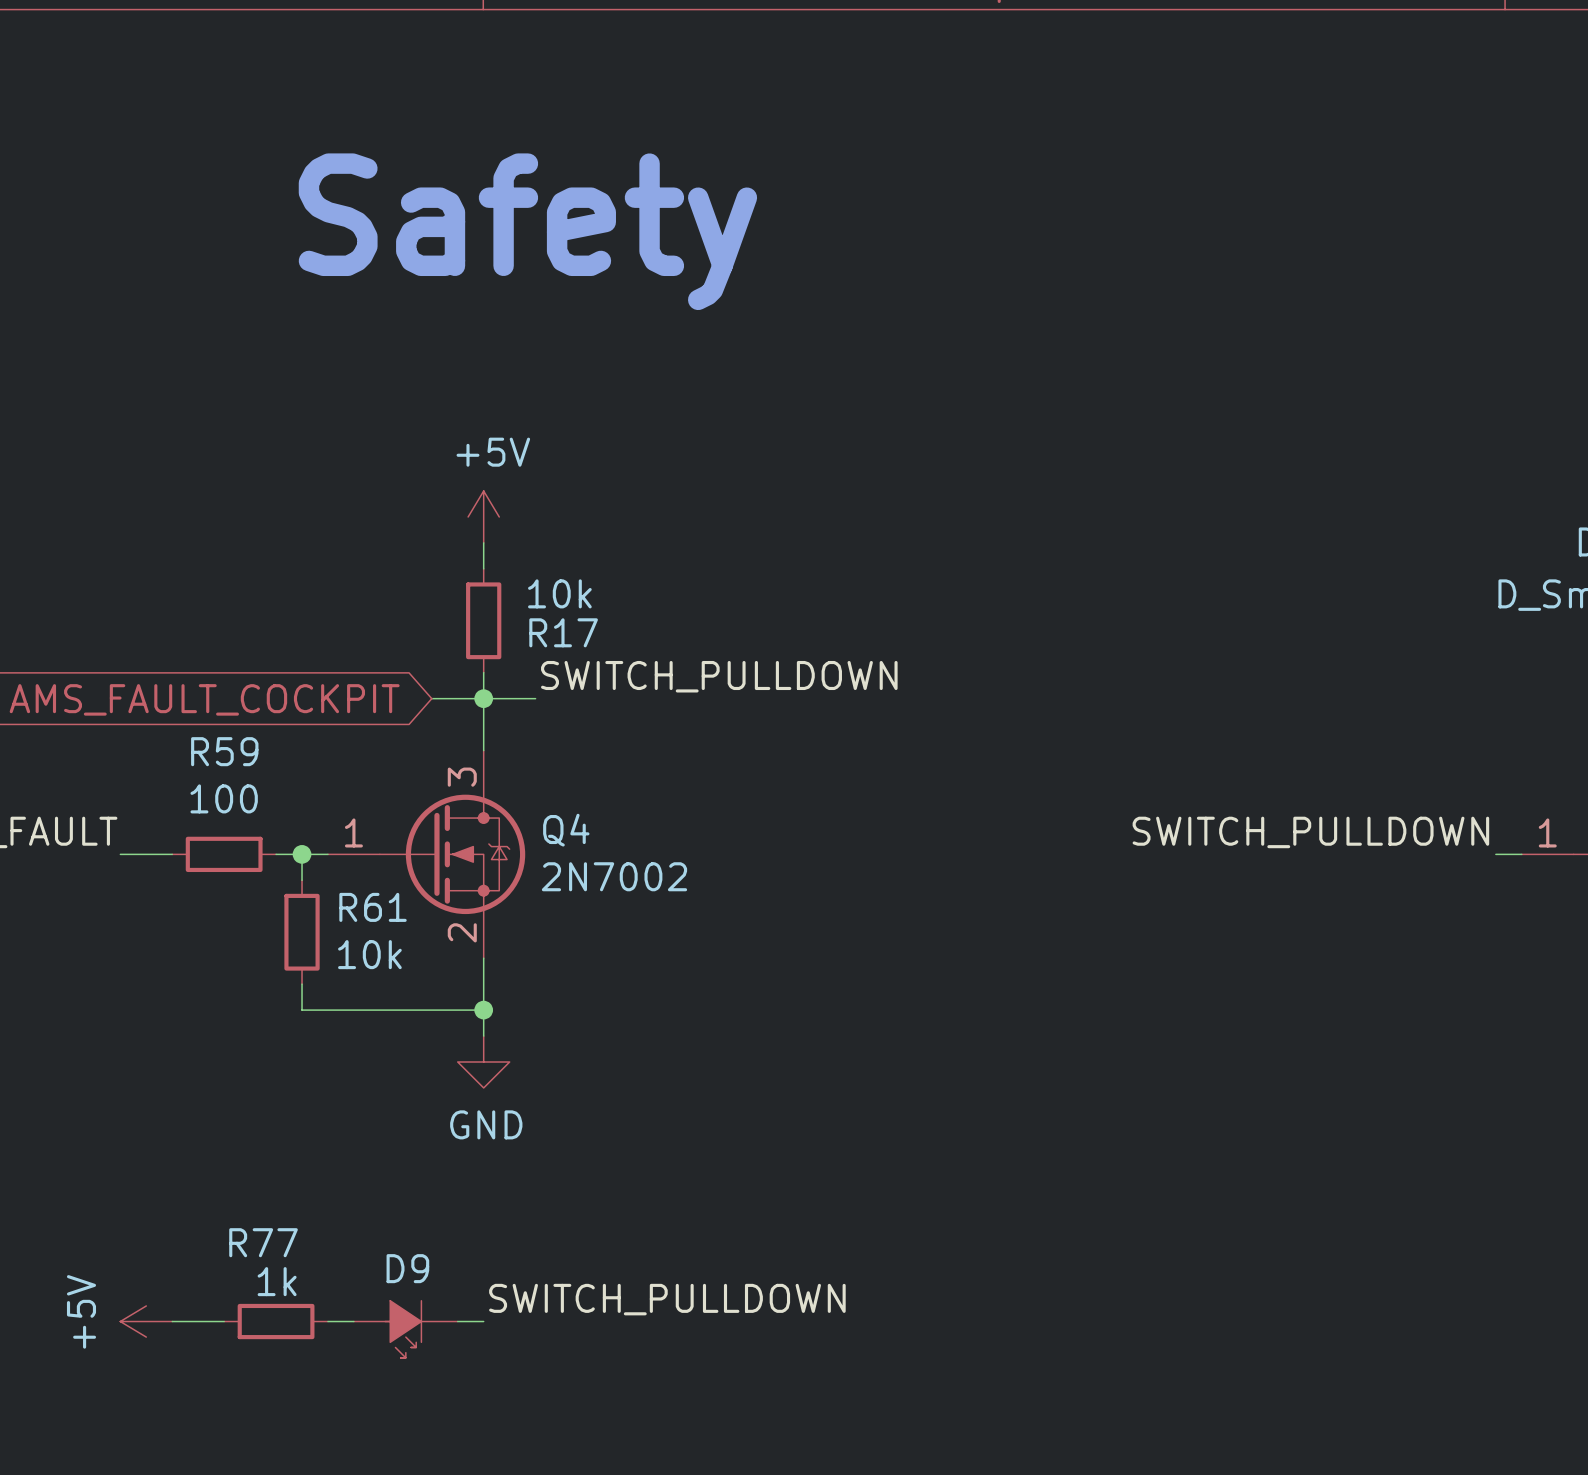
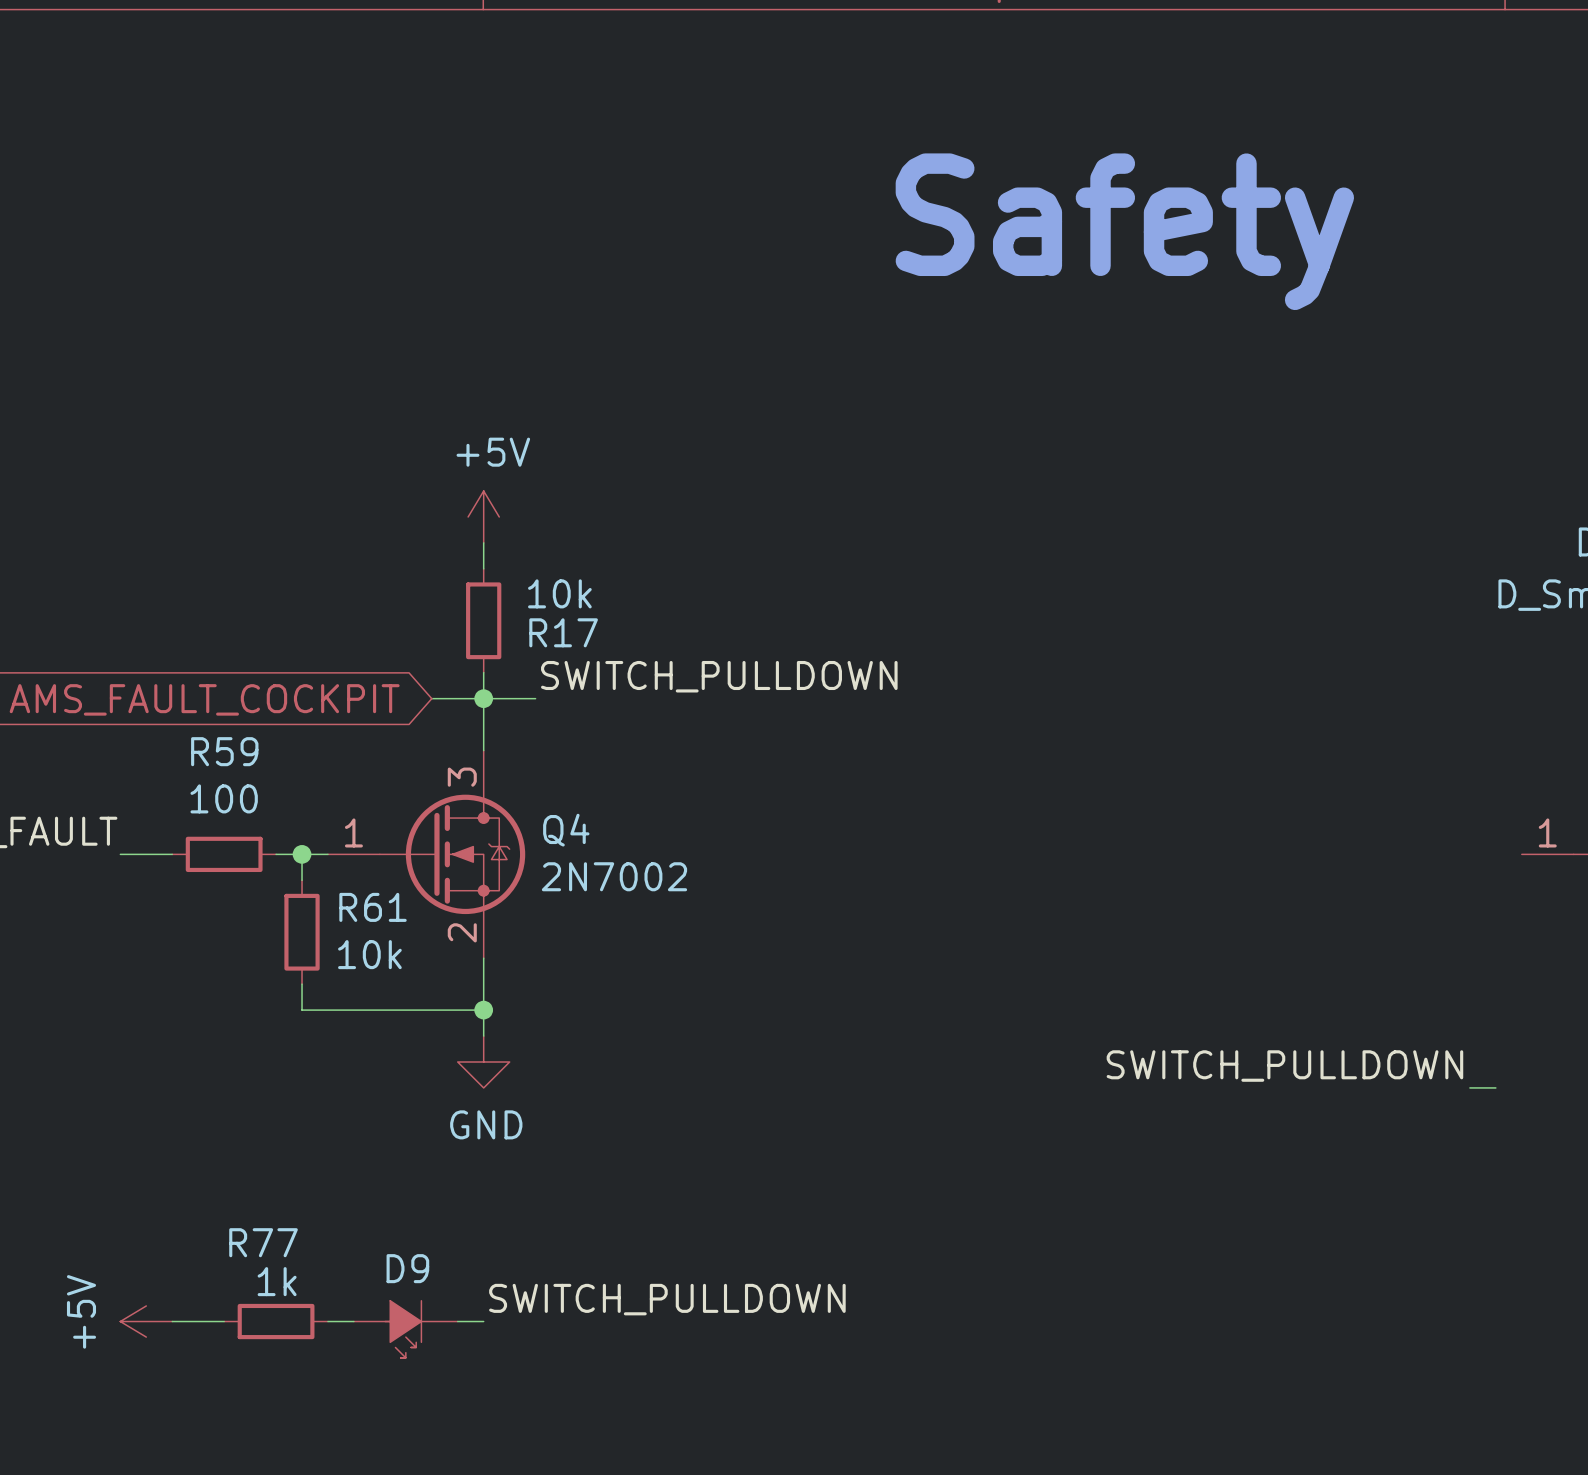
text: Safety (527, 231) -> none
text: none -> Safety (1124, 231)
label position: SWITCH_PULLDOWN (1310, 832) -> SWITCH_PULLDOWN (1284, 1066)
wire: (1495, 854) (1521, 854) -> (1469, 1087) (1495, 1087)

